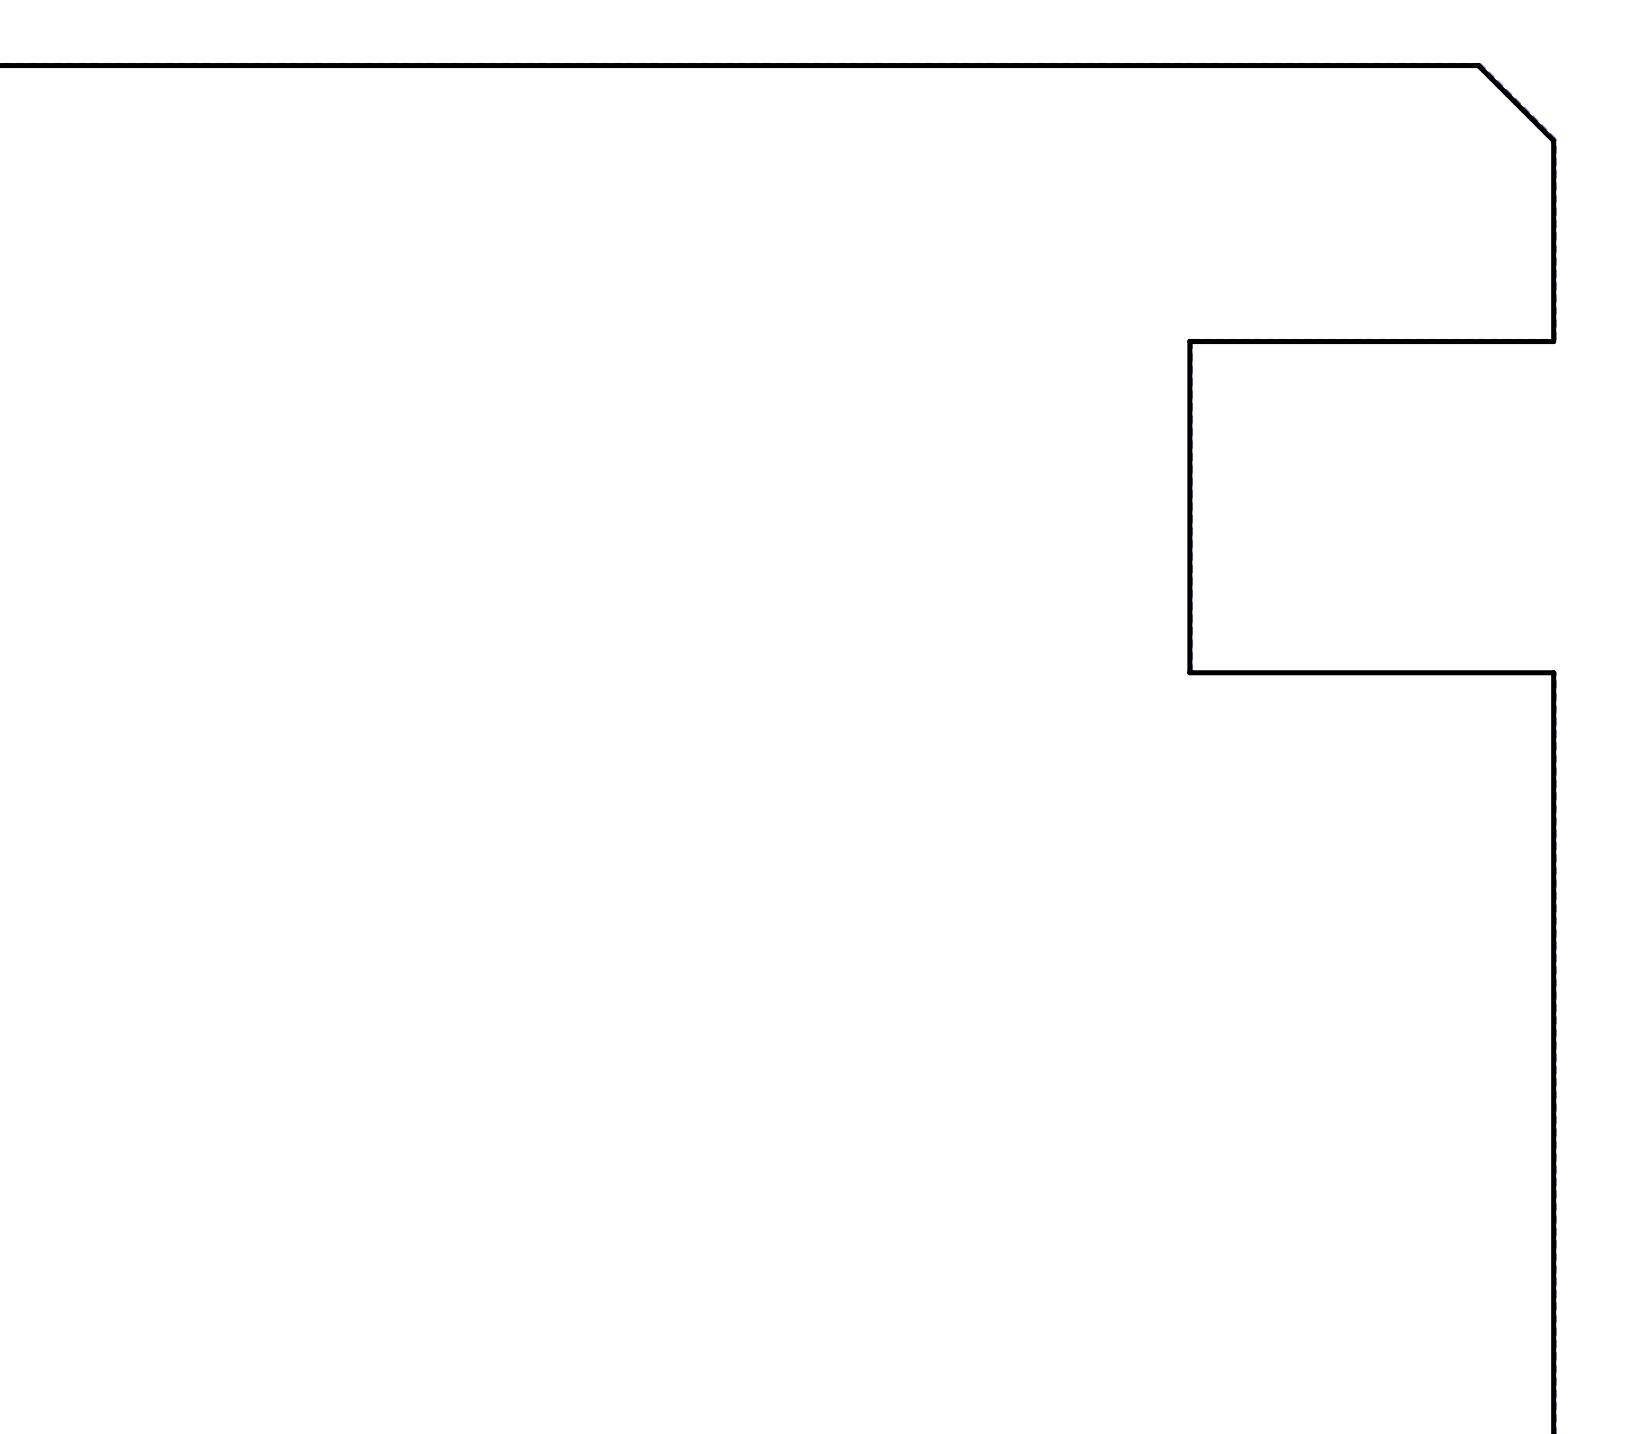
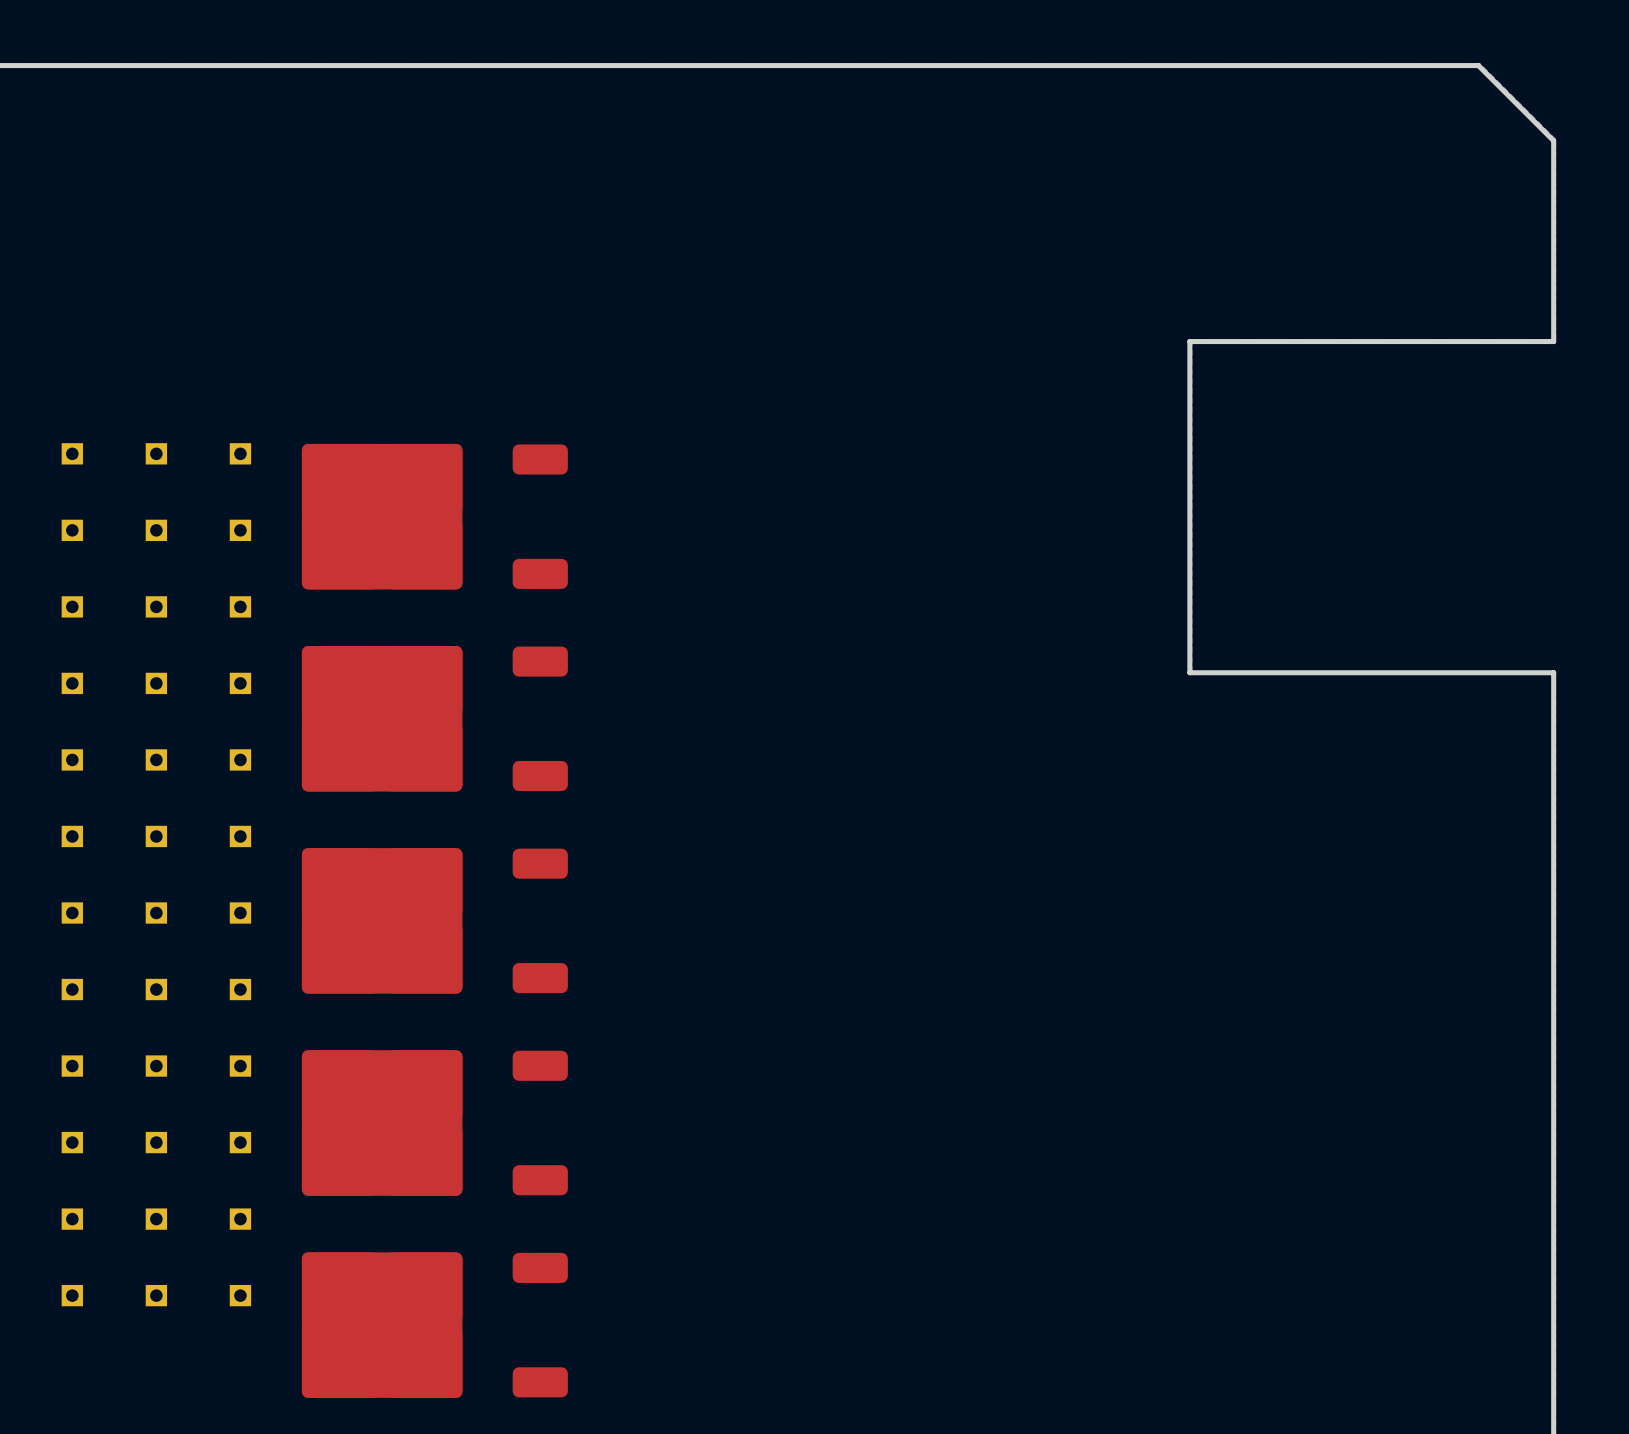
part: none -> (72, 453)
part: none -> (156, 453)
part: none -> (240, 453)
part: none -> (434, 516)
part: none -> (72, 530)
part: none -> (156, 530)
part: none -> (240, 530)
part: none -> (72, 606)
part: none -> (156, 606)
part: none -> (240, 606)
part: none -> (72, 683)
part: none -> (156, 683)
part: none -> (240, 683)
part: none -> (434, 718)
part: none -> (72, 759)
part: none -> (156, 759)
part: none -> (240, 759)
part: none -> (72, 836)
part: none -> (156, 836)
part: none -> (240, 836)
part: none -> (72, 912)
part: none -> (156, 912)
part: none -> (240, 912)
part: none -> (434, 920)
part: none -> (72, 989)
part: none -> (156, 989)
part: none -> (240, 989)
part: none -> (72, 1066)
part: none -> (156, 1066)
part: none -> (240, 1066)
part: none -> (434, 1123)
part: none -> (72, 1142)
part: none -> (156, 1142)
part: none -> (240, 1142)
part: none -> (72, 1219)
part: none -> (156, 1219)
part: none -> (240, 1219)
part: none -> (72, 1295)
part: none -> (156, 1295)
part: none -> (240, 1295)
part: none -> (434, 1325)

